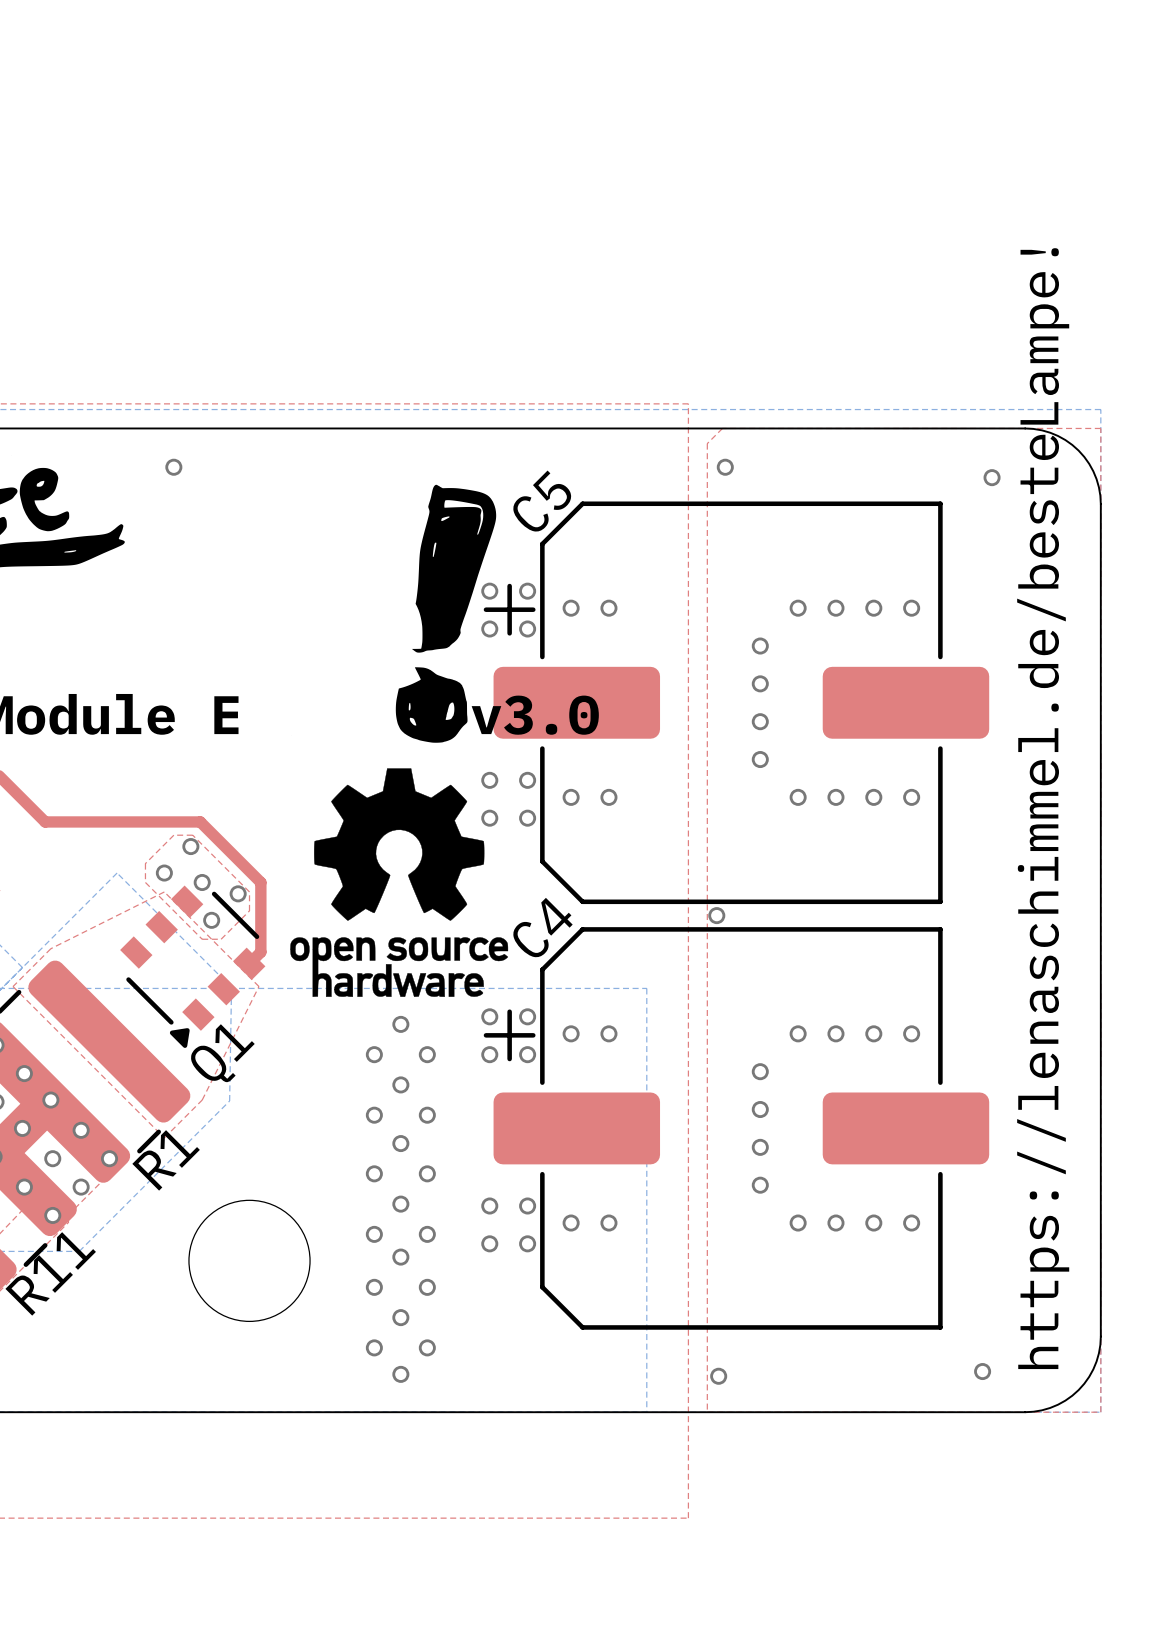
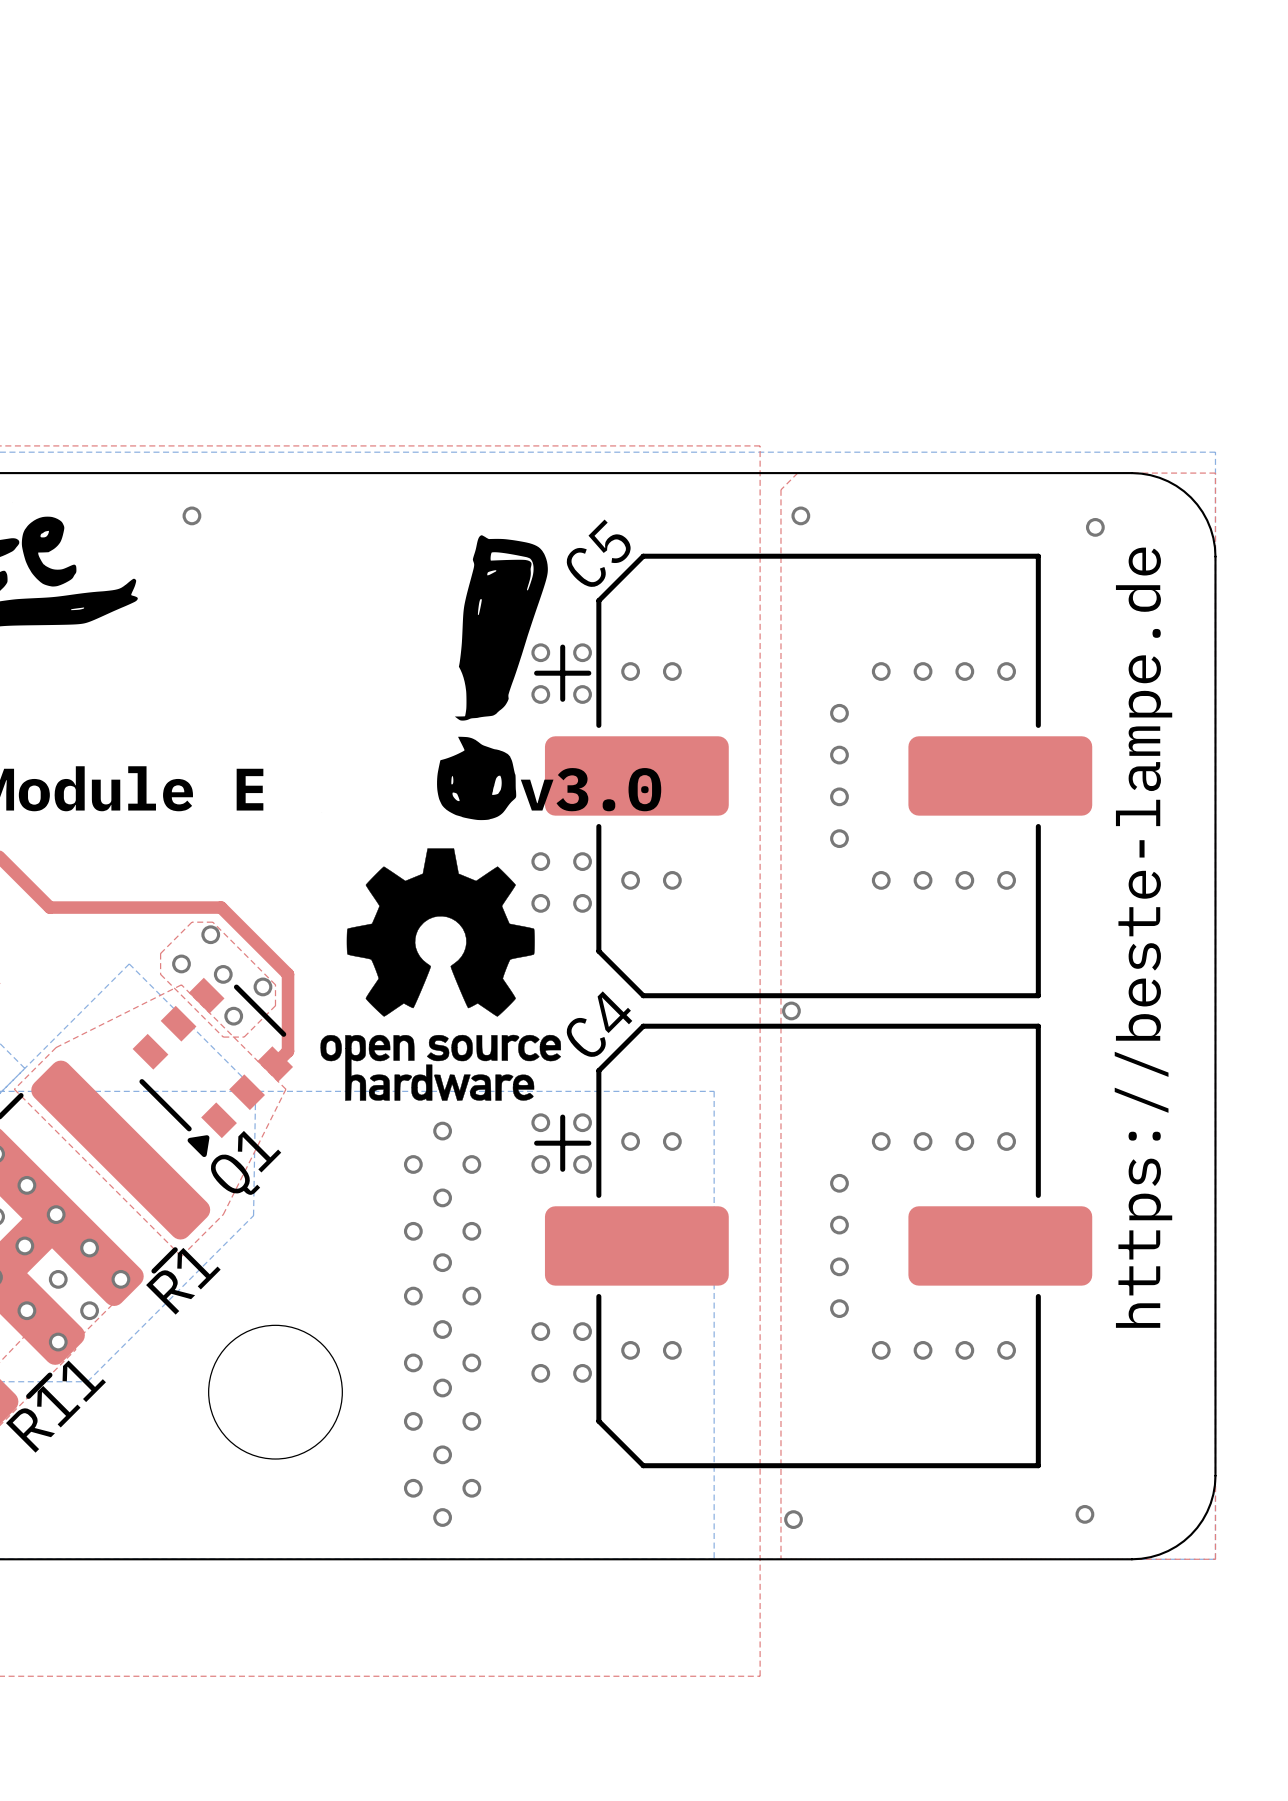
text: https://lenaschimmel.de/besteLampe! (1043, 808) -> none
text: none -> https://beste-lampe.de (1143, 937)

